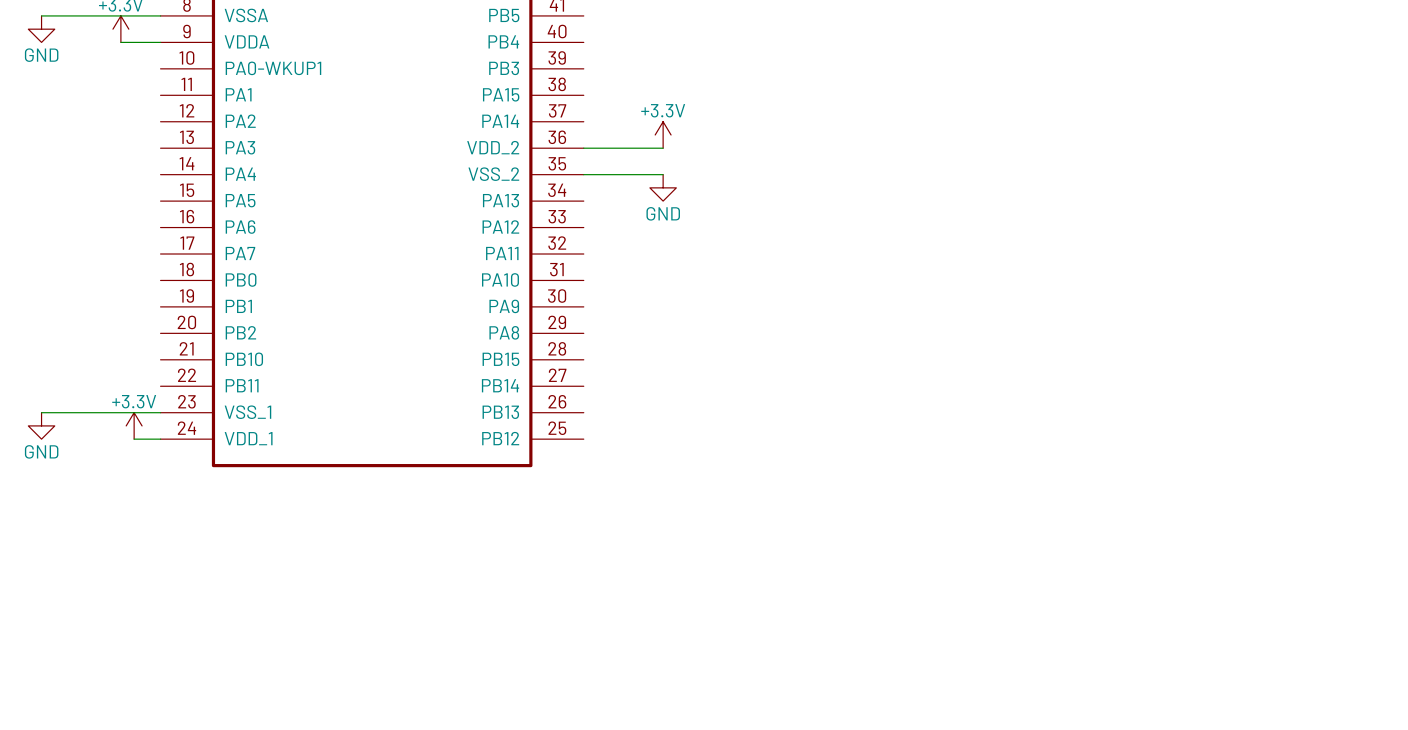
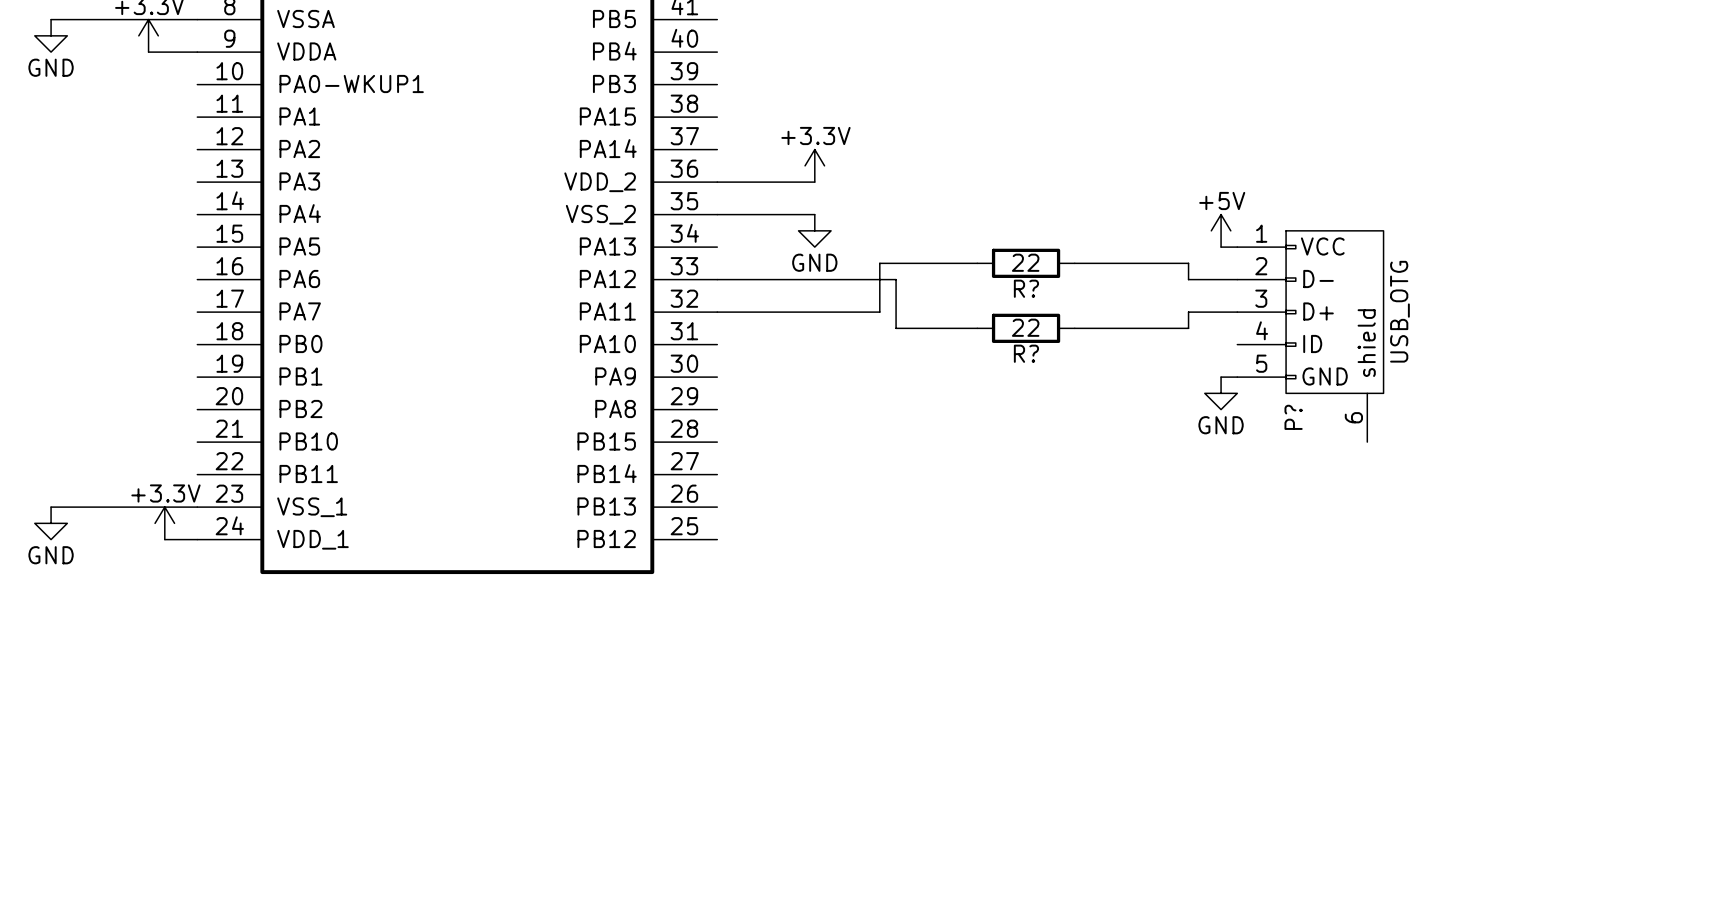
power symbol: none -> +5V (1221, 230)
wire: none -> (1221, 247) (1237, 247)
wire: none -> (977, 263) (879, 263) (879, 312) (717, 312)
R?: none -> 22 (1026, 263)
wire: none -> (1074, 263) (1188, 263) (1188, 279) (1237, 279)
wire: none -> (717, 279) (896, 279) (896, 328) (977, 328)
wire: none -> (1237, 312) (1188, 312) (1188, 328) (1074, 328)
R?: none -> 22 (1026, 328)
P?: none -> USB_OTG (1310, 336)
wire: none -> (1221, 377) (1237, 377)
power symbol: none -> GND (1221, 393)

